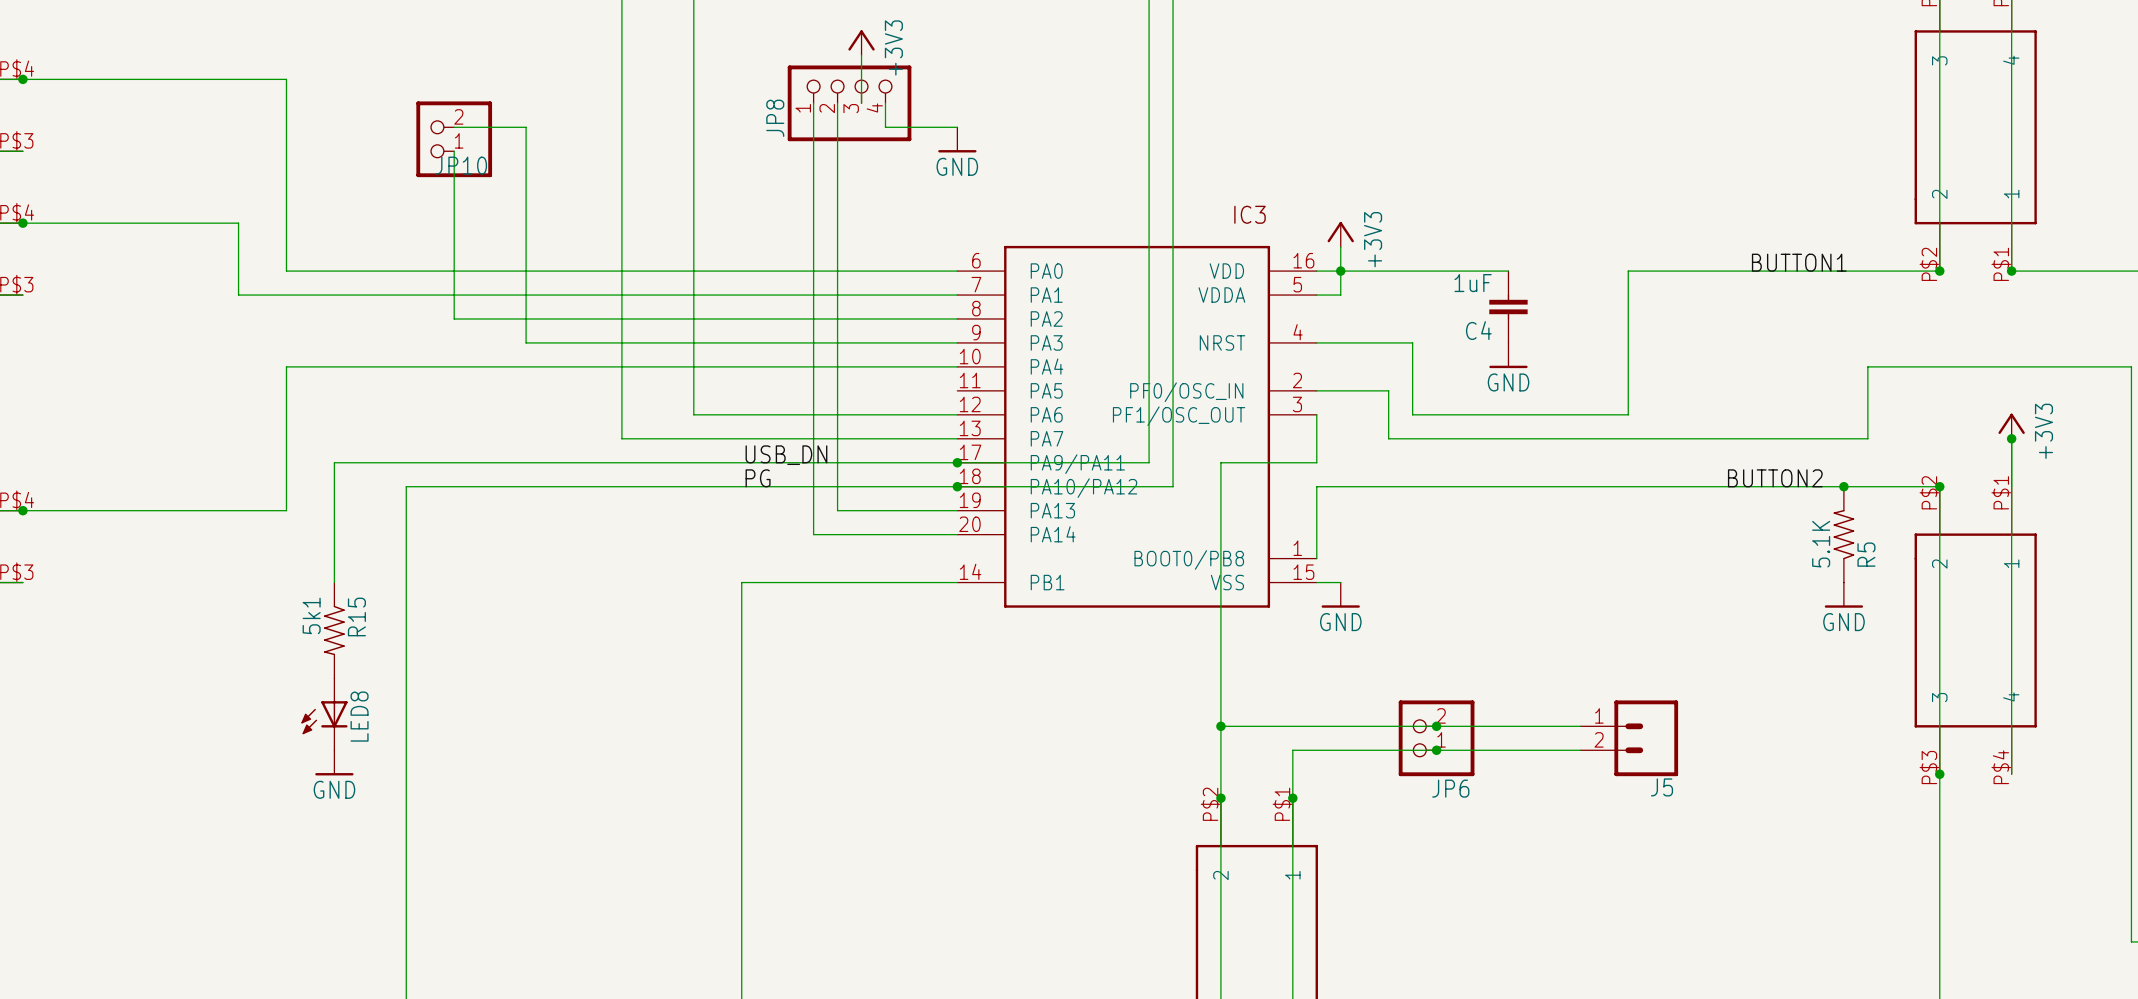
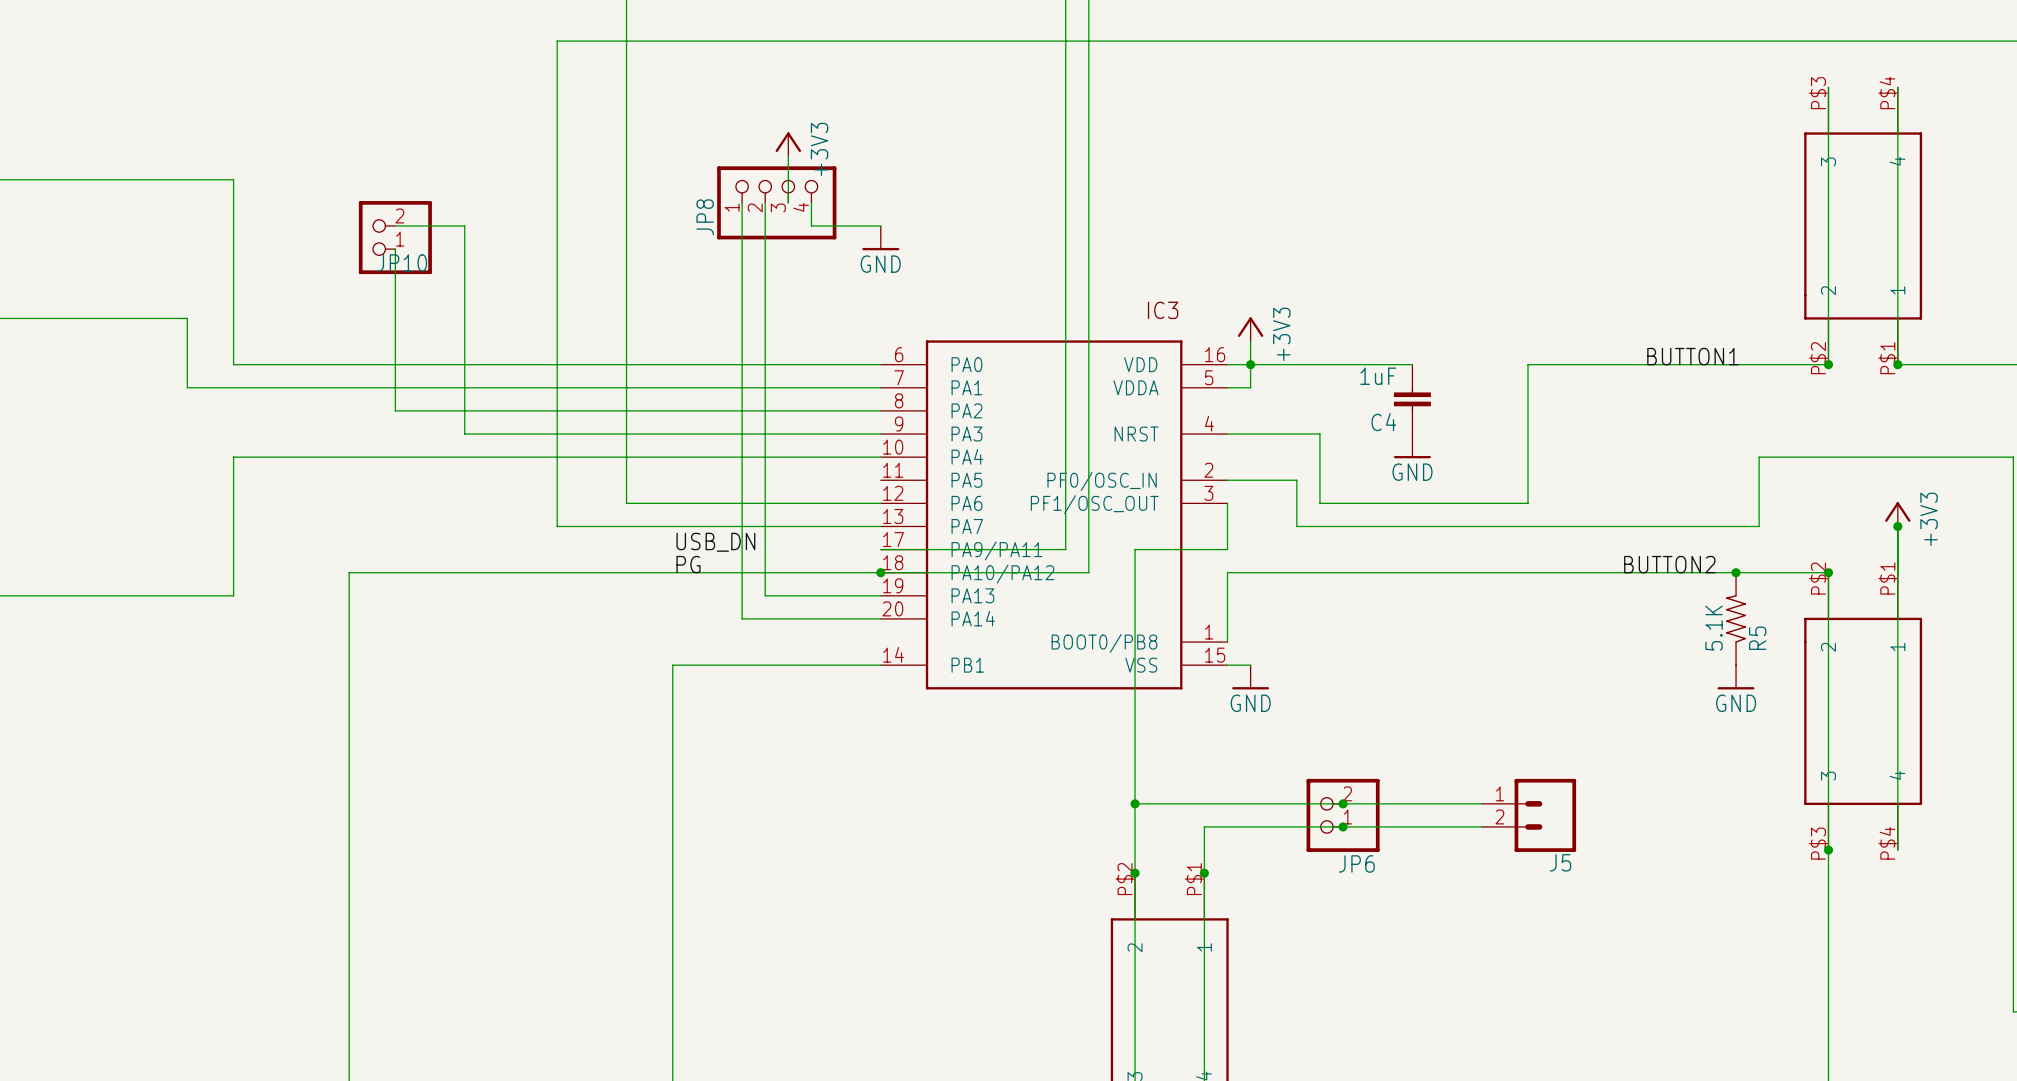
wire: (957, 462) (334, 462) (334, 582) -> none
junction: (957, 462) -> none
R15: 5k1 (334, 630) -> none
LED8: (324, 714) -> none
power symbol: GND (334, 762) -> none

